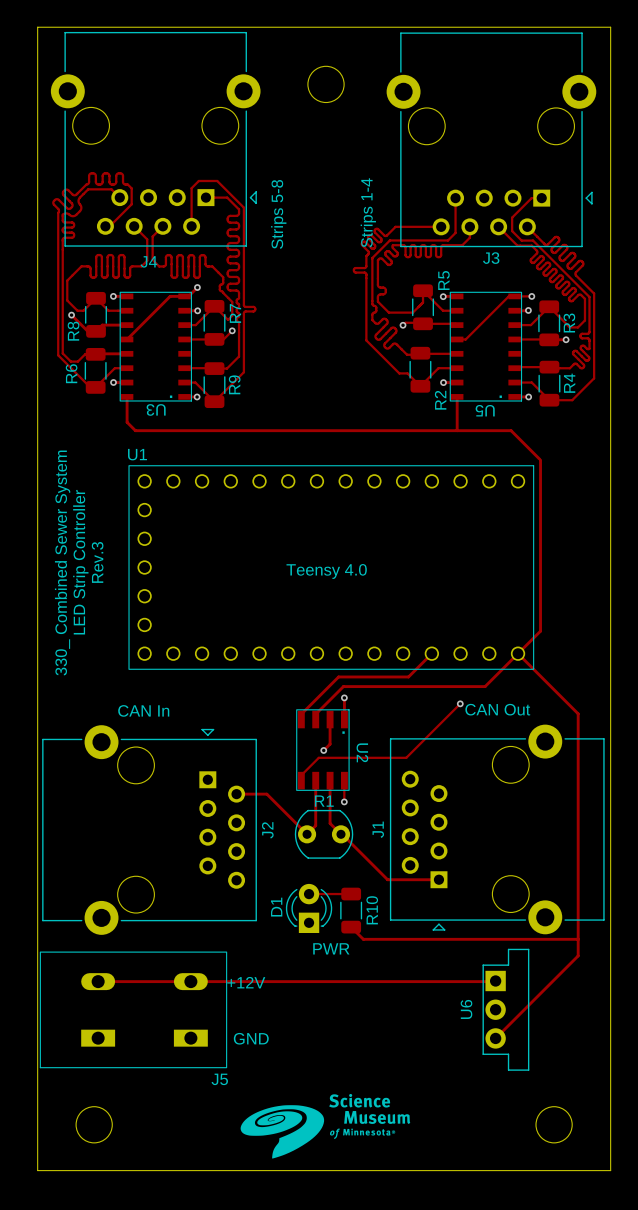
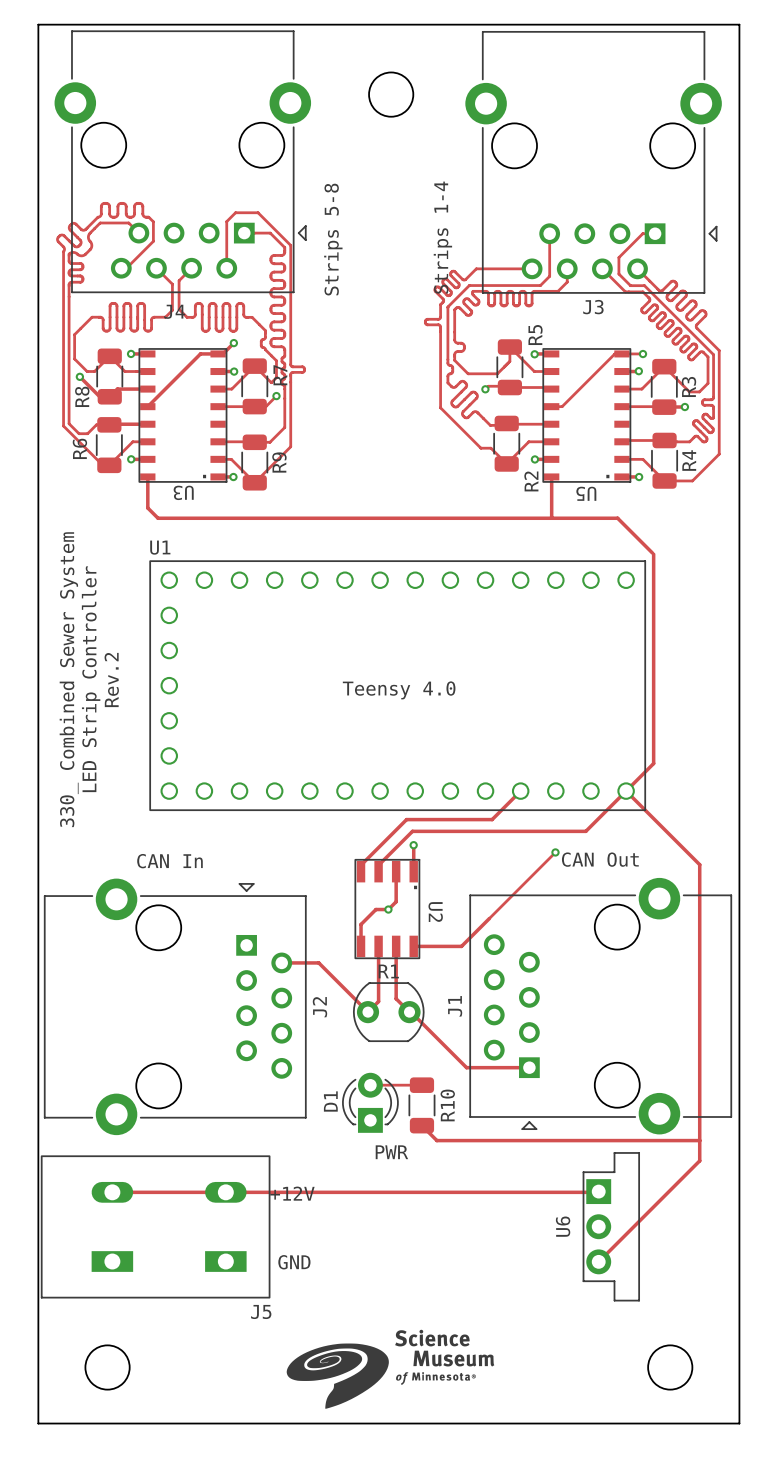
text: Rev.3 (97, 562) -> Rev.2 (111, 680)
track: none -> (388, 909) (375, 909) (361, 924) (361, 939)
track: (406, 757) (318, 757) (301, 775) -> (489, 918) (461, 946) (413, 946)
track: (344, 780) (344, 801) -> none
via: (344, 801) -> none

